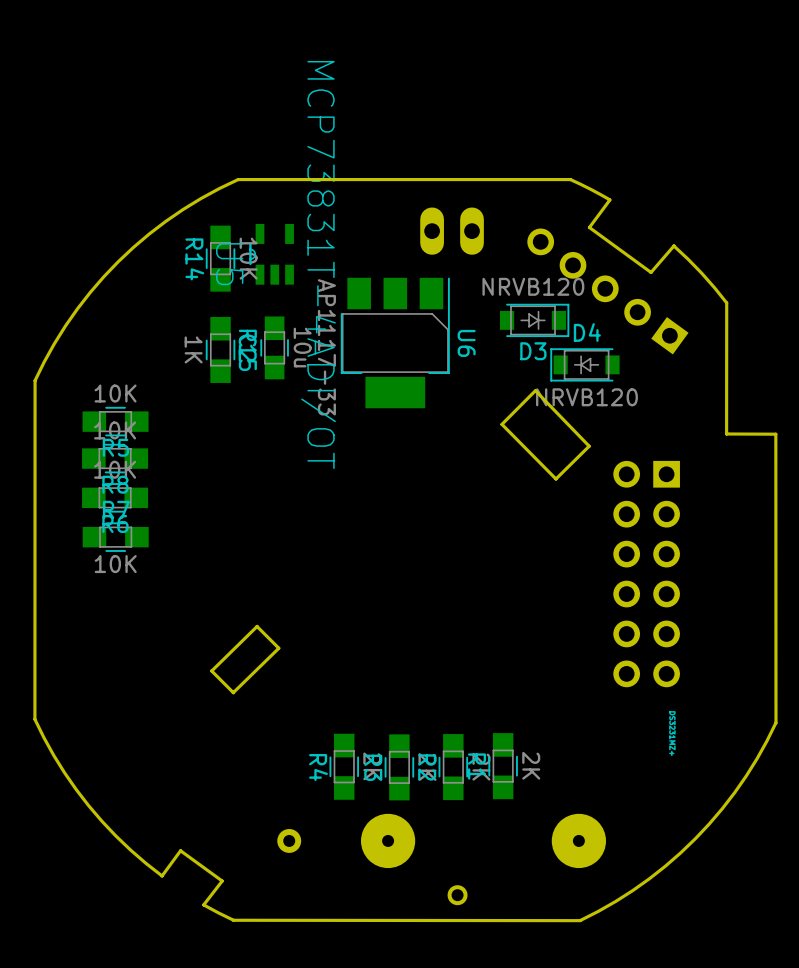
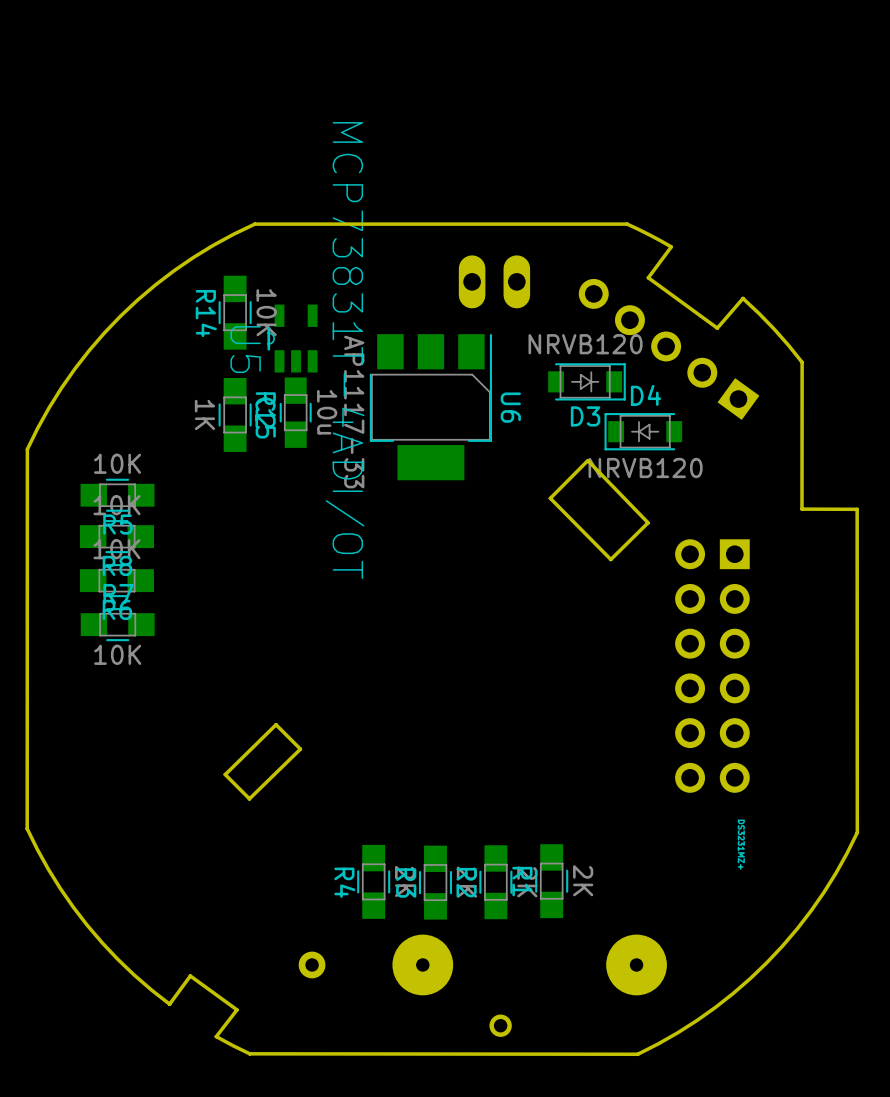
U5 position: (271, 254) -> (292, 338)

